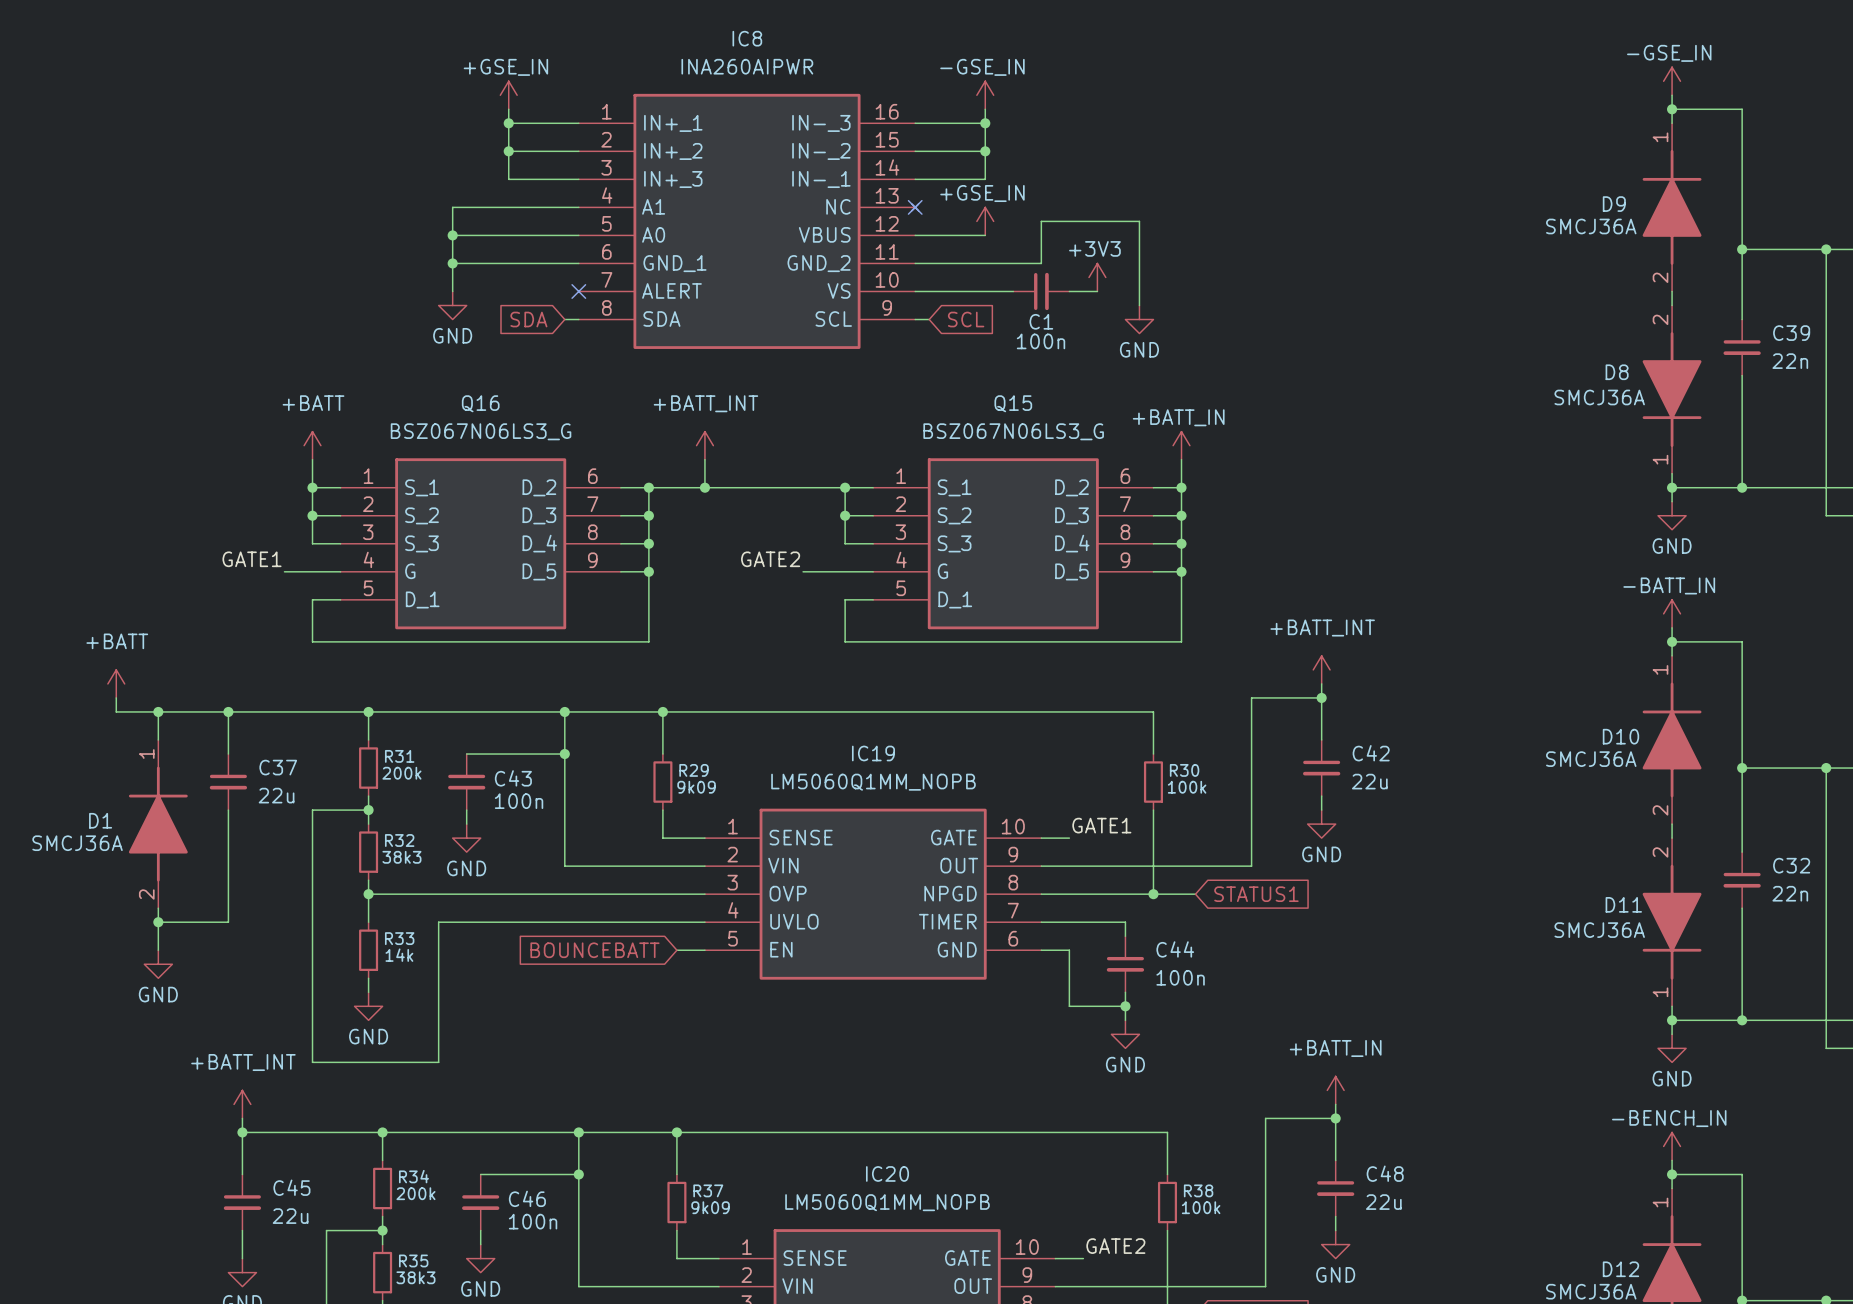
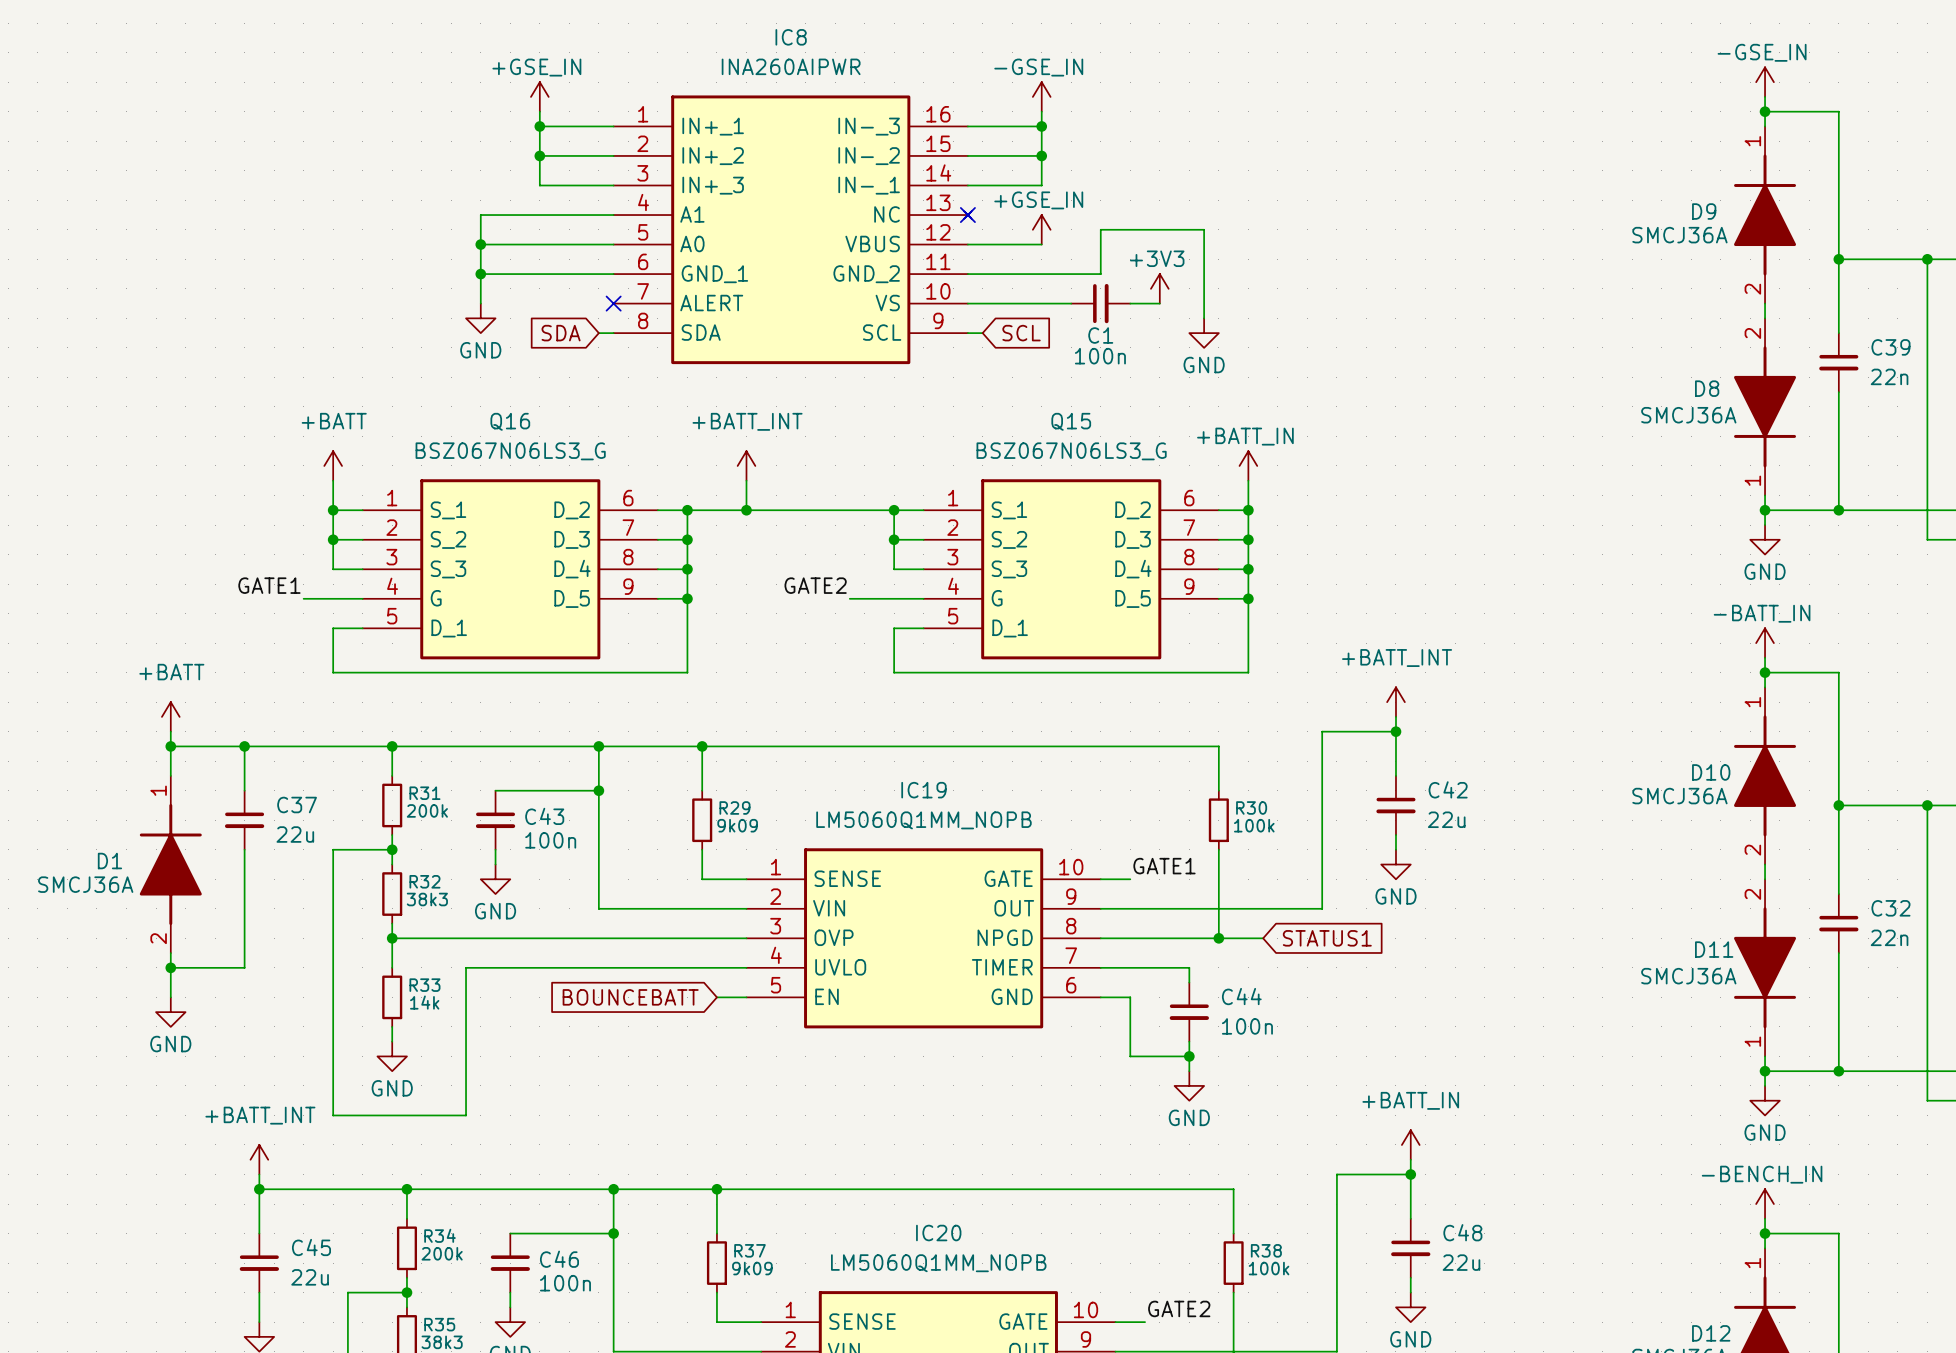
power symbol position: +BATT (116, 683) -> +BATT (170, 716)
wire: (116, 697) (116, 711) (158, 711) -> (170, 731) (170, 746)

